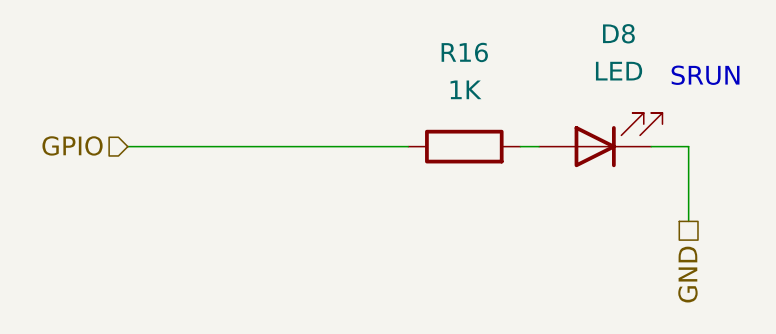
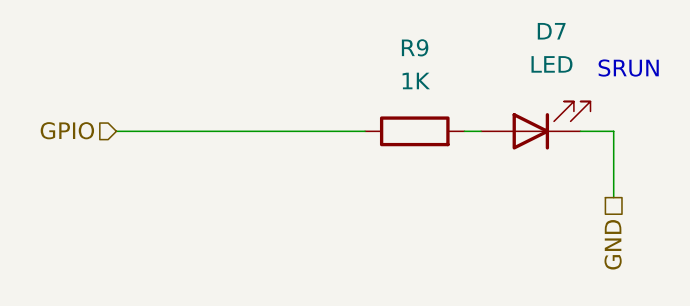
D8 name: D8 (618, 33) -> D7 (551, 31)
R16 name: R16 (464, 52) -> R9 (415, 47)

